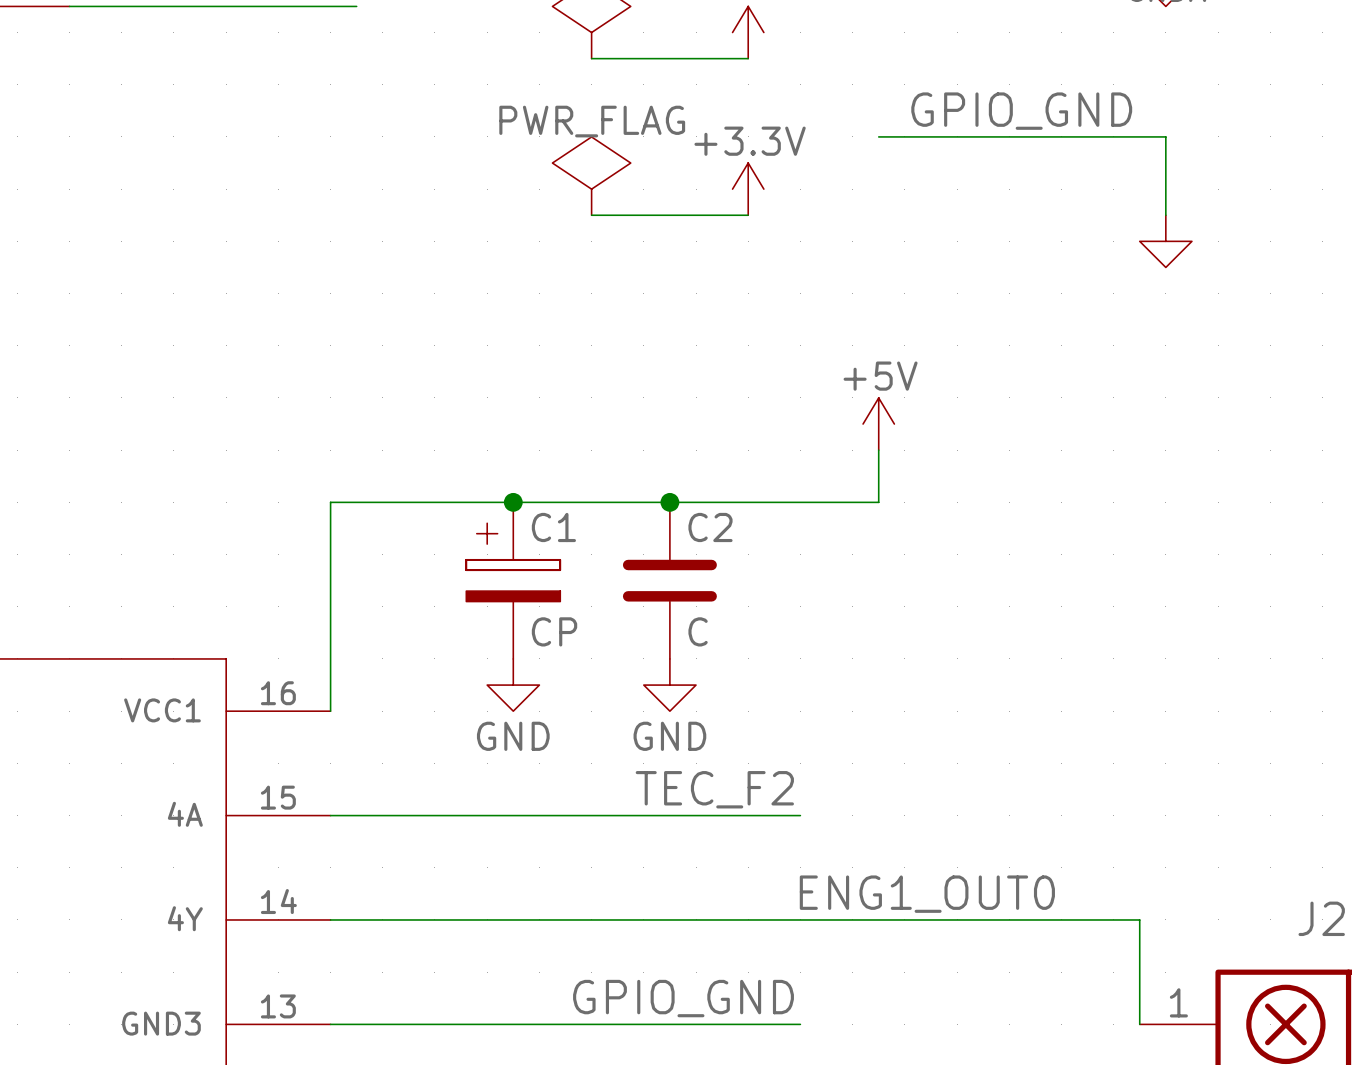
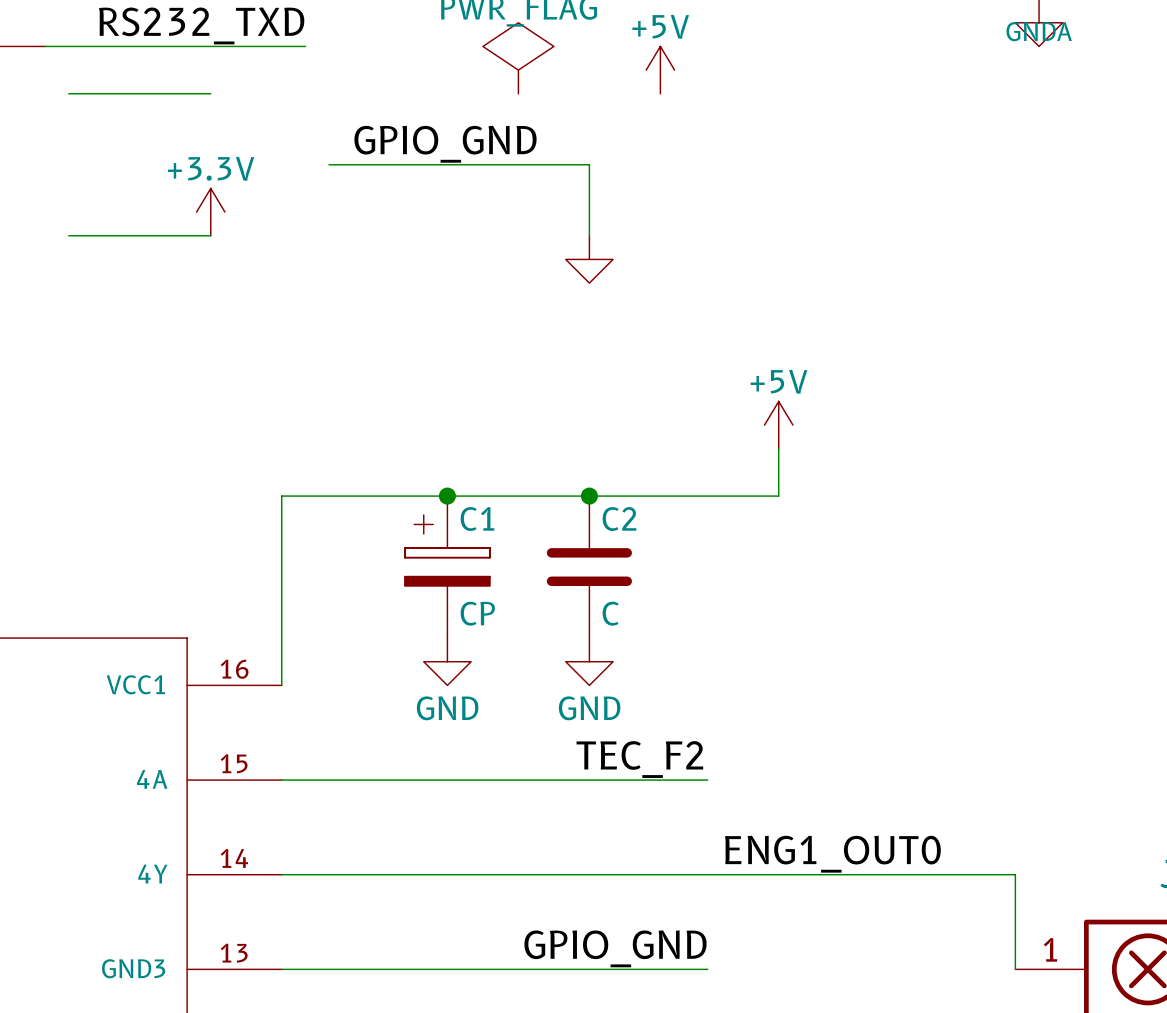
wire: (591, 58) (748, 58) -> (68, 93) (210, 93)
label: none -> GPIO_GND (445, 144)
label: GPIO_GND (1021, 111) -> none
wire: (878, 136) (1165, 136) (1165, 215) -> (329, 164) (589, 164) (589, 235)
power symbol: PWR_FLAG (591, 176) -> none
power symbol: none -> +3.3V (210, 212)
power symbol: +3.3V (748, 189) -> none
wire: (591, 215) (748, 215) -> (68, 235) (210, 235)
power symbol position: (1165, 241) -> (589, 259)

